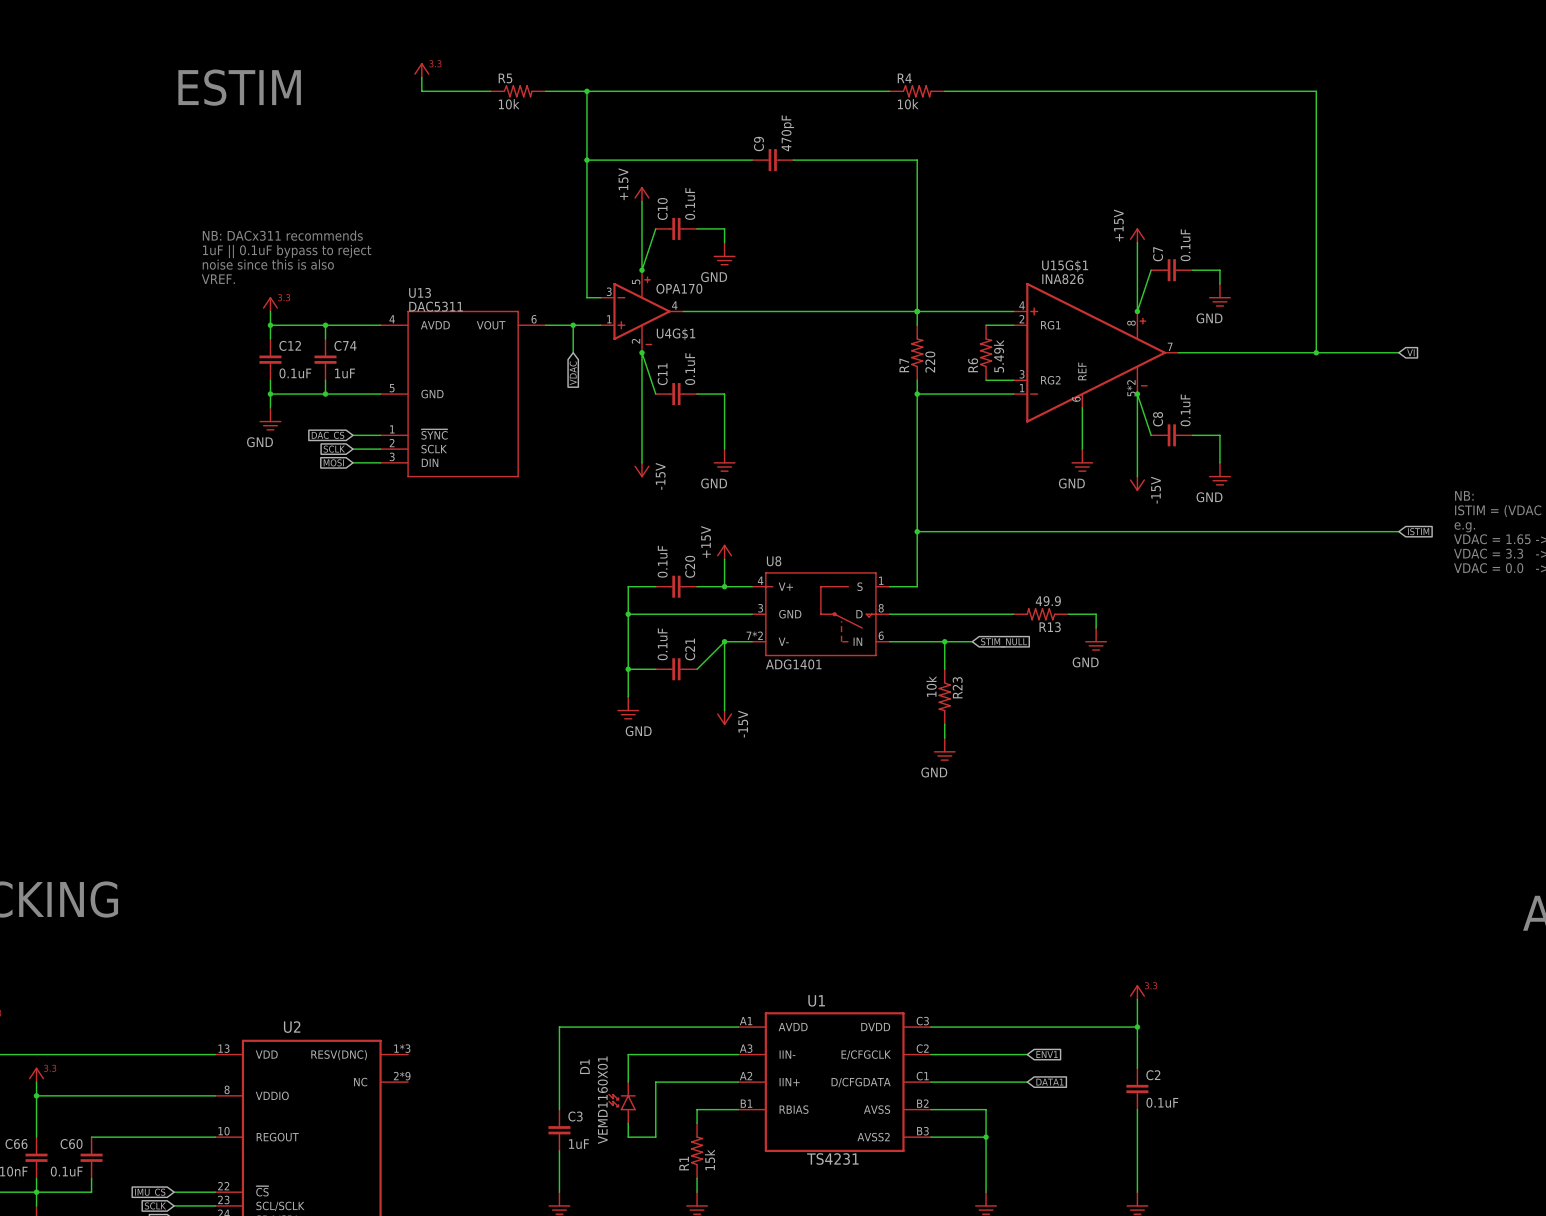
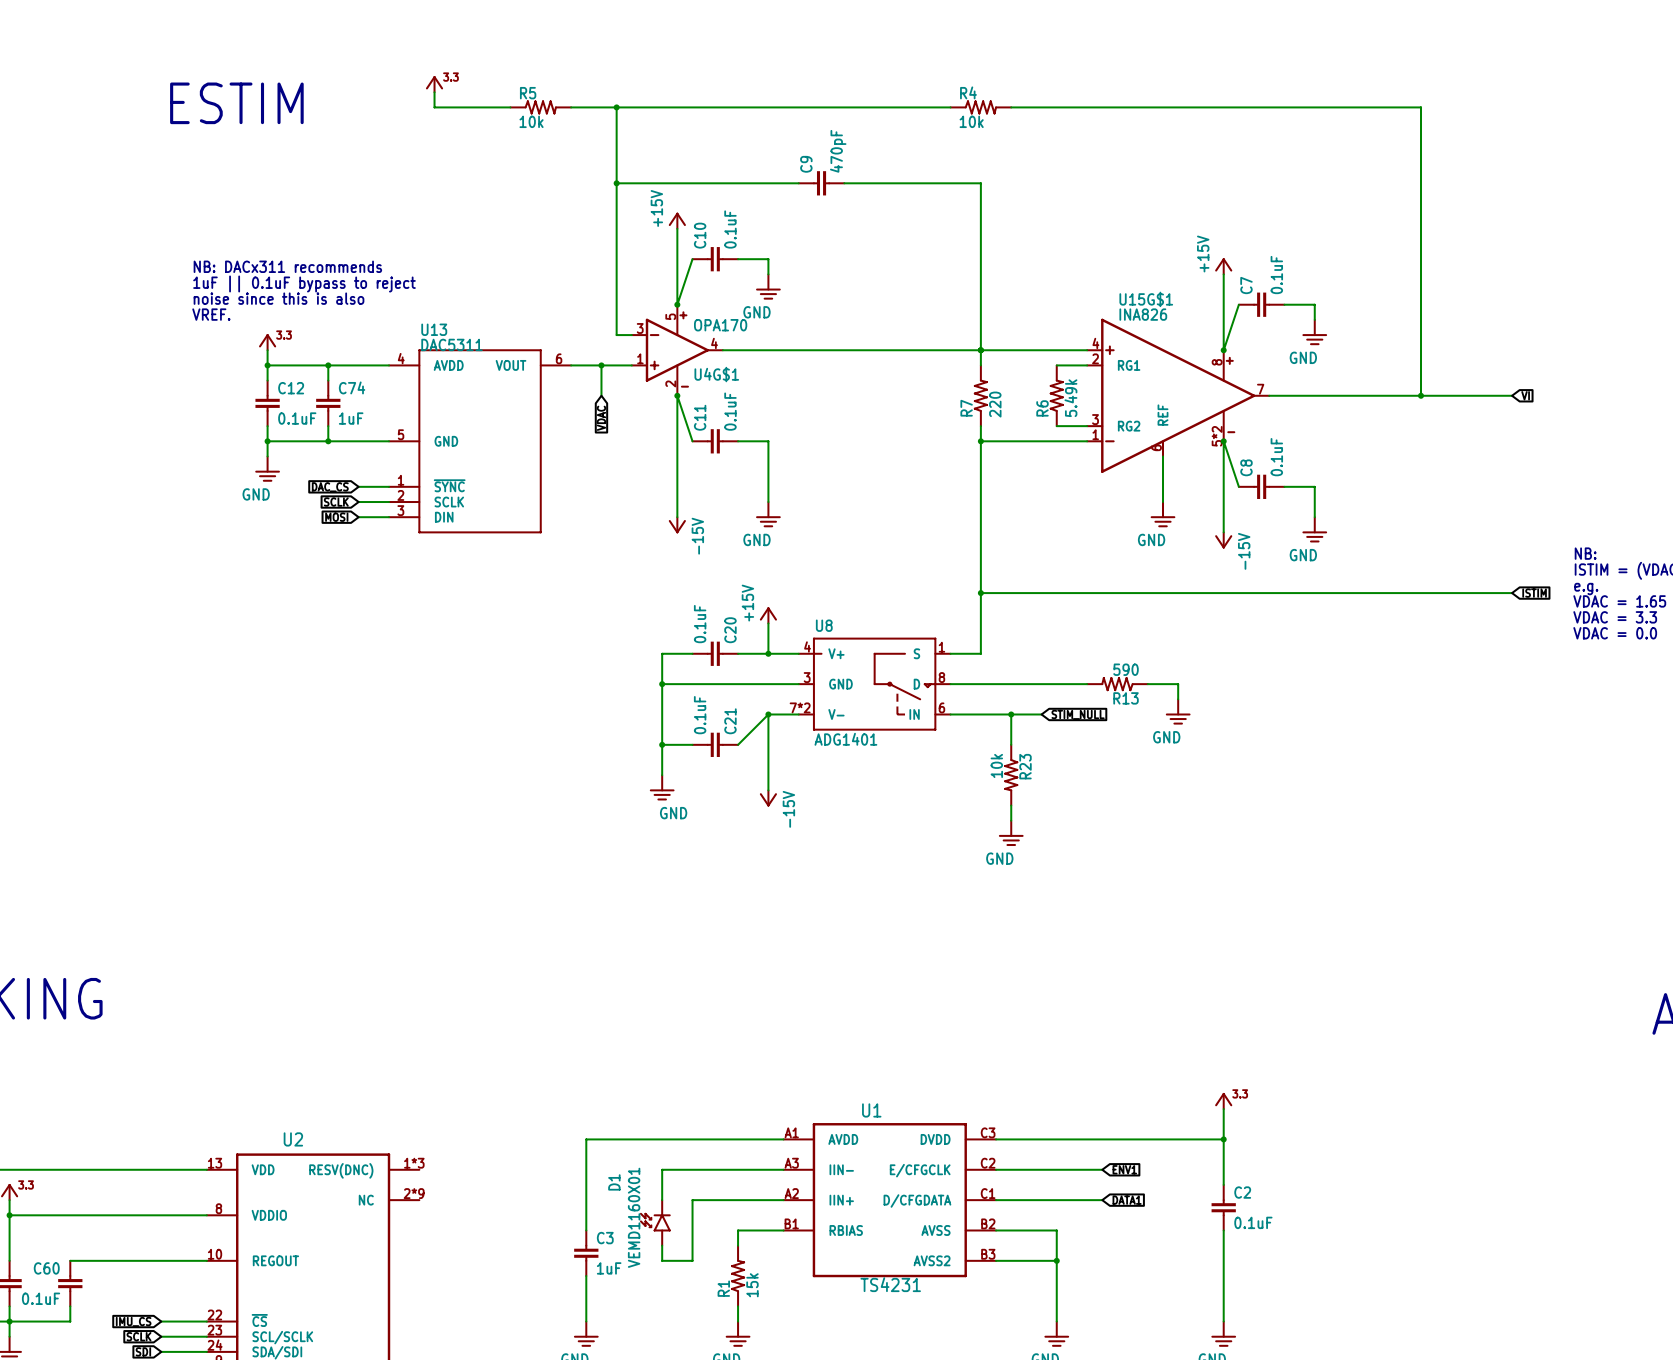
R13 value: 49.9 (1048, 601) -> 590 (1126, 669)

